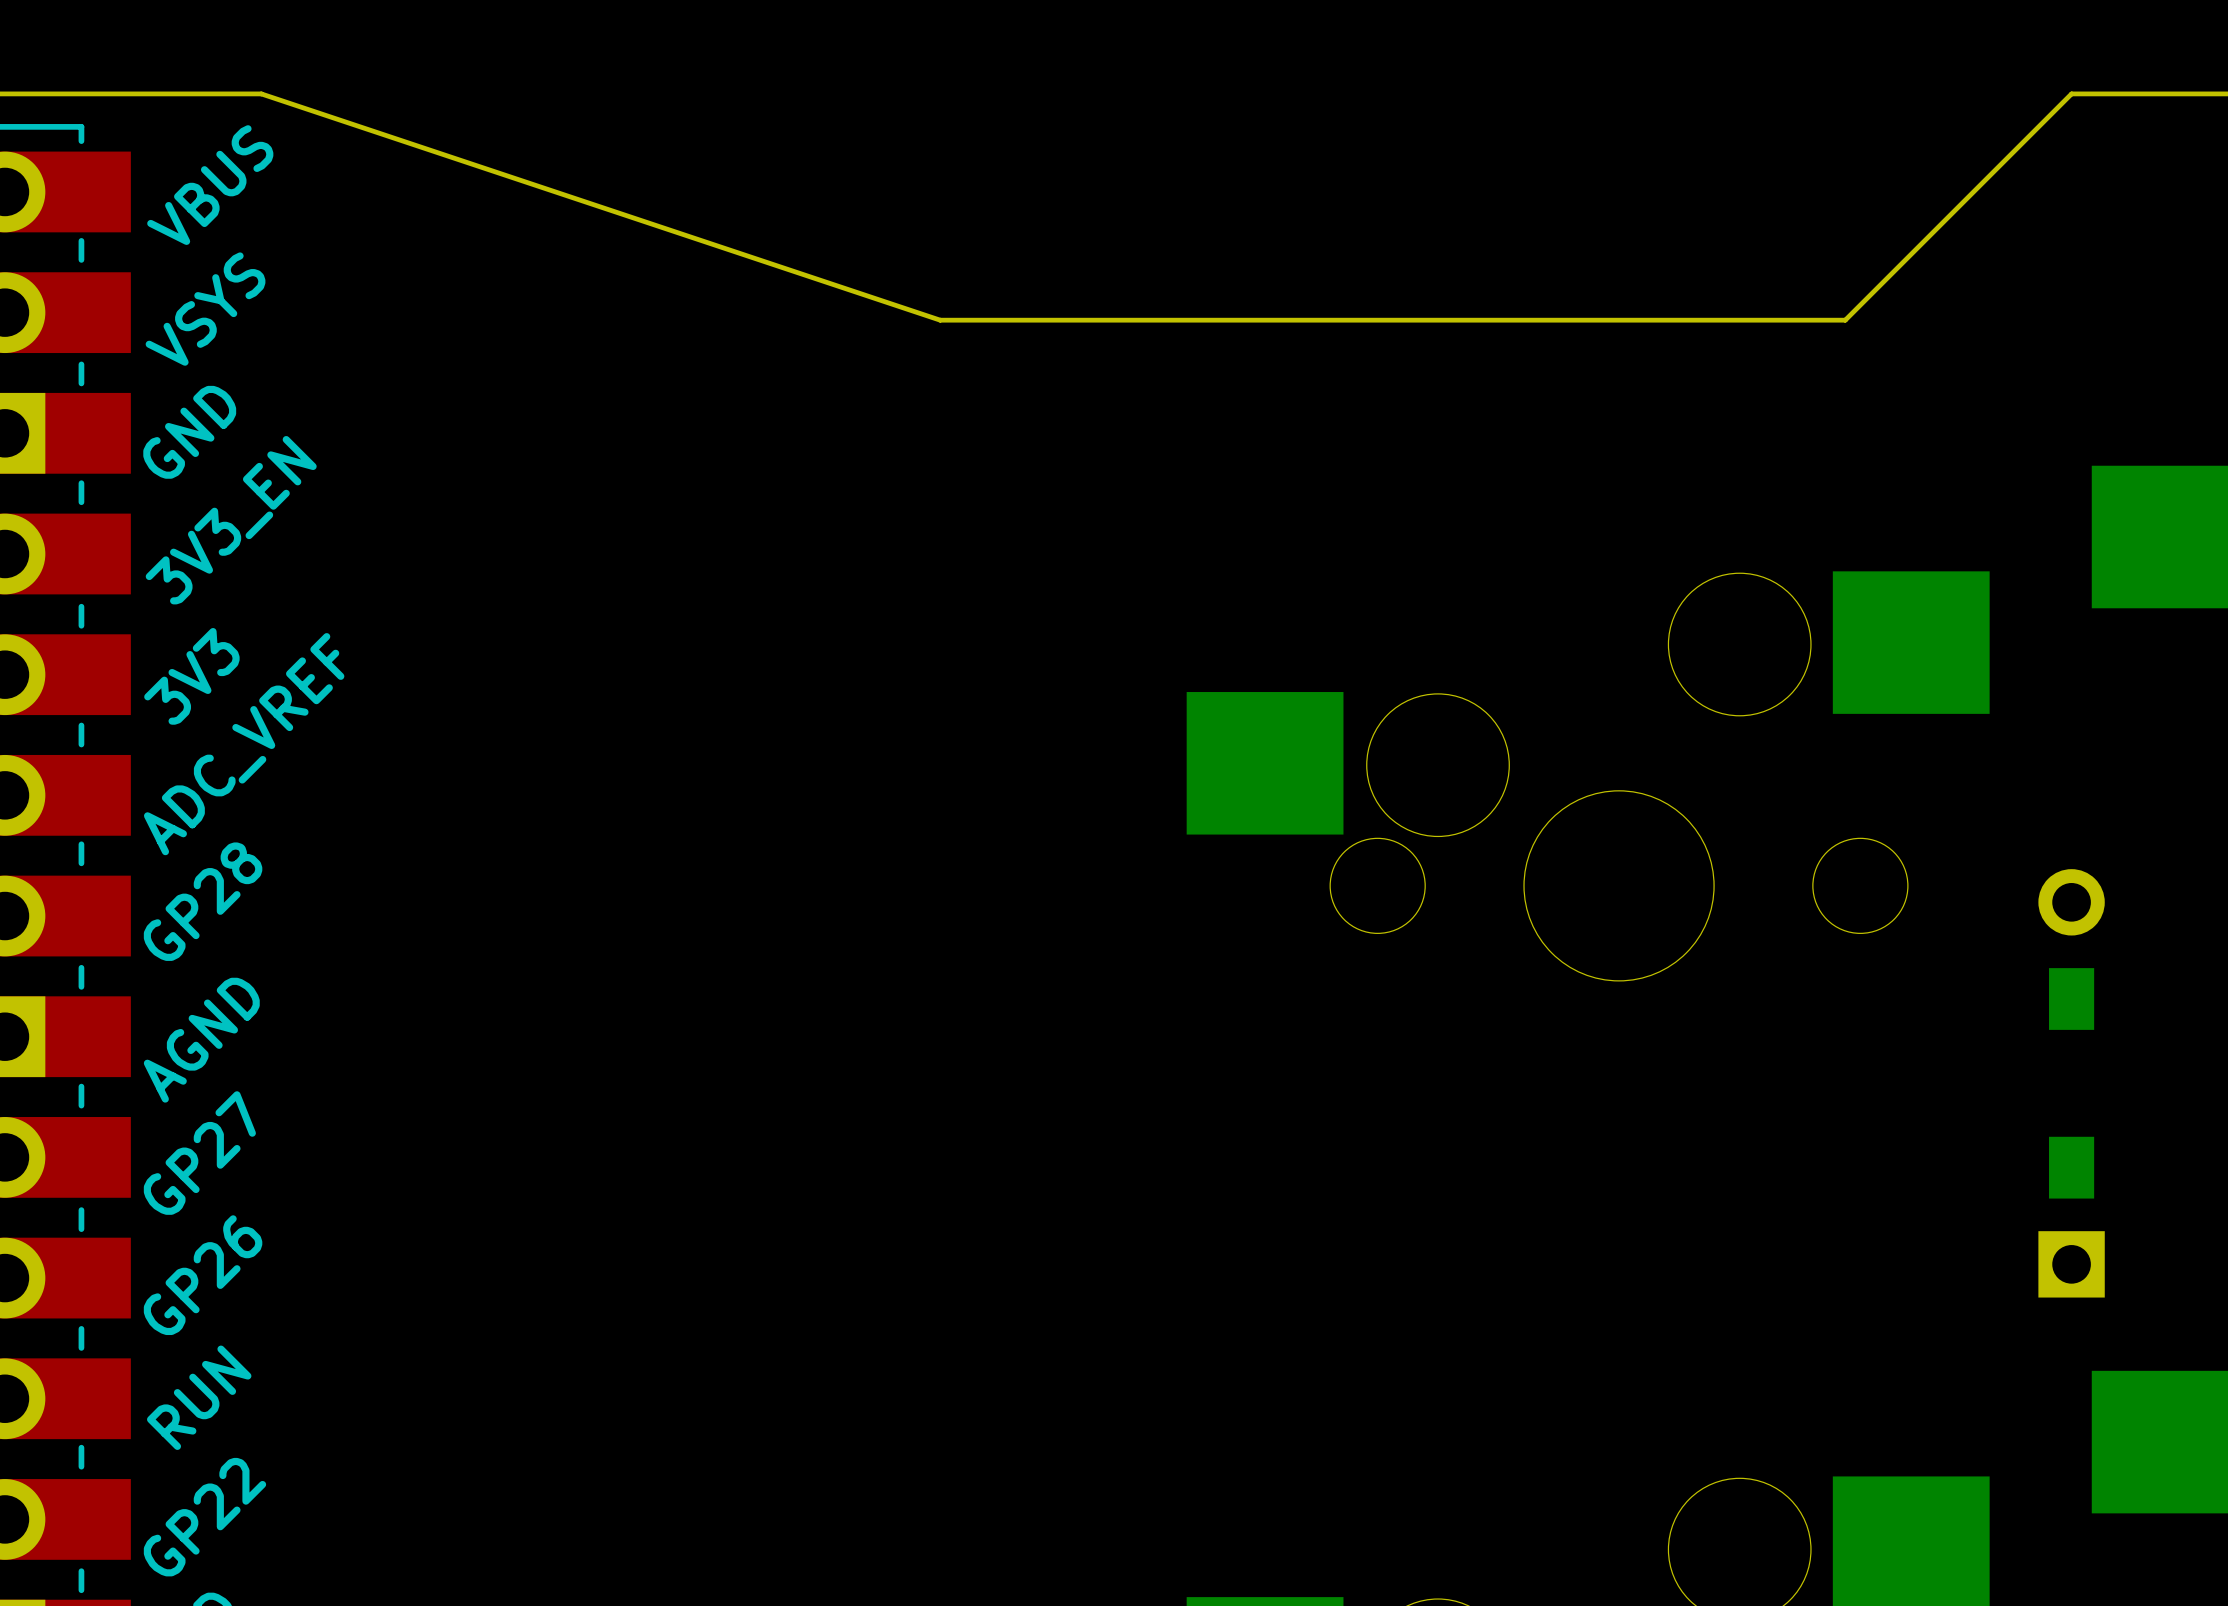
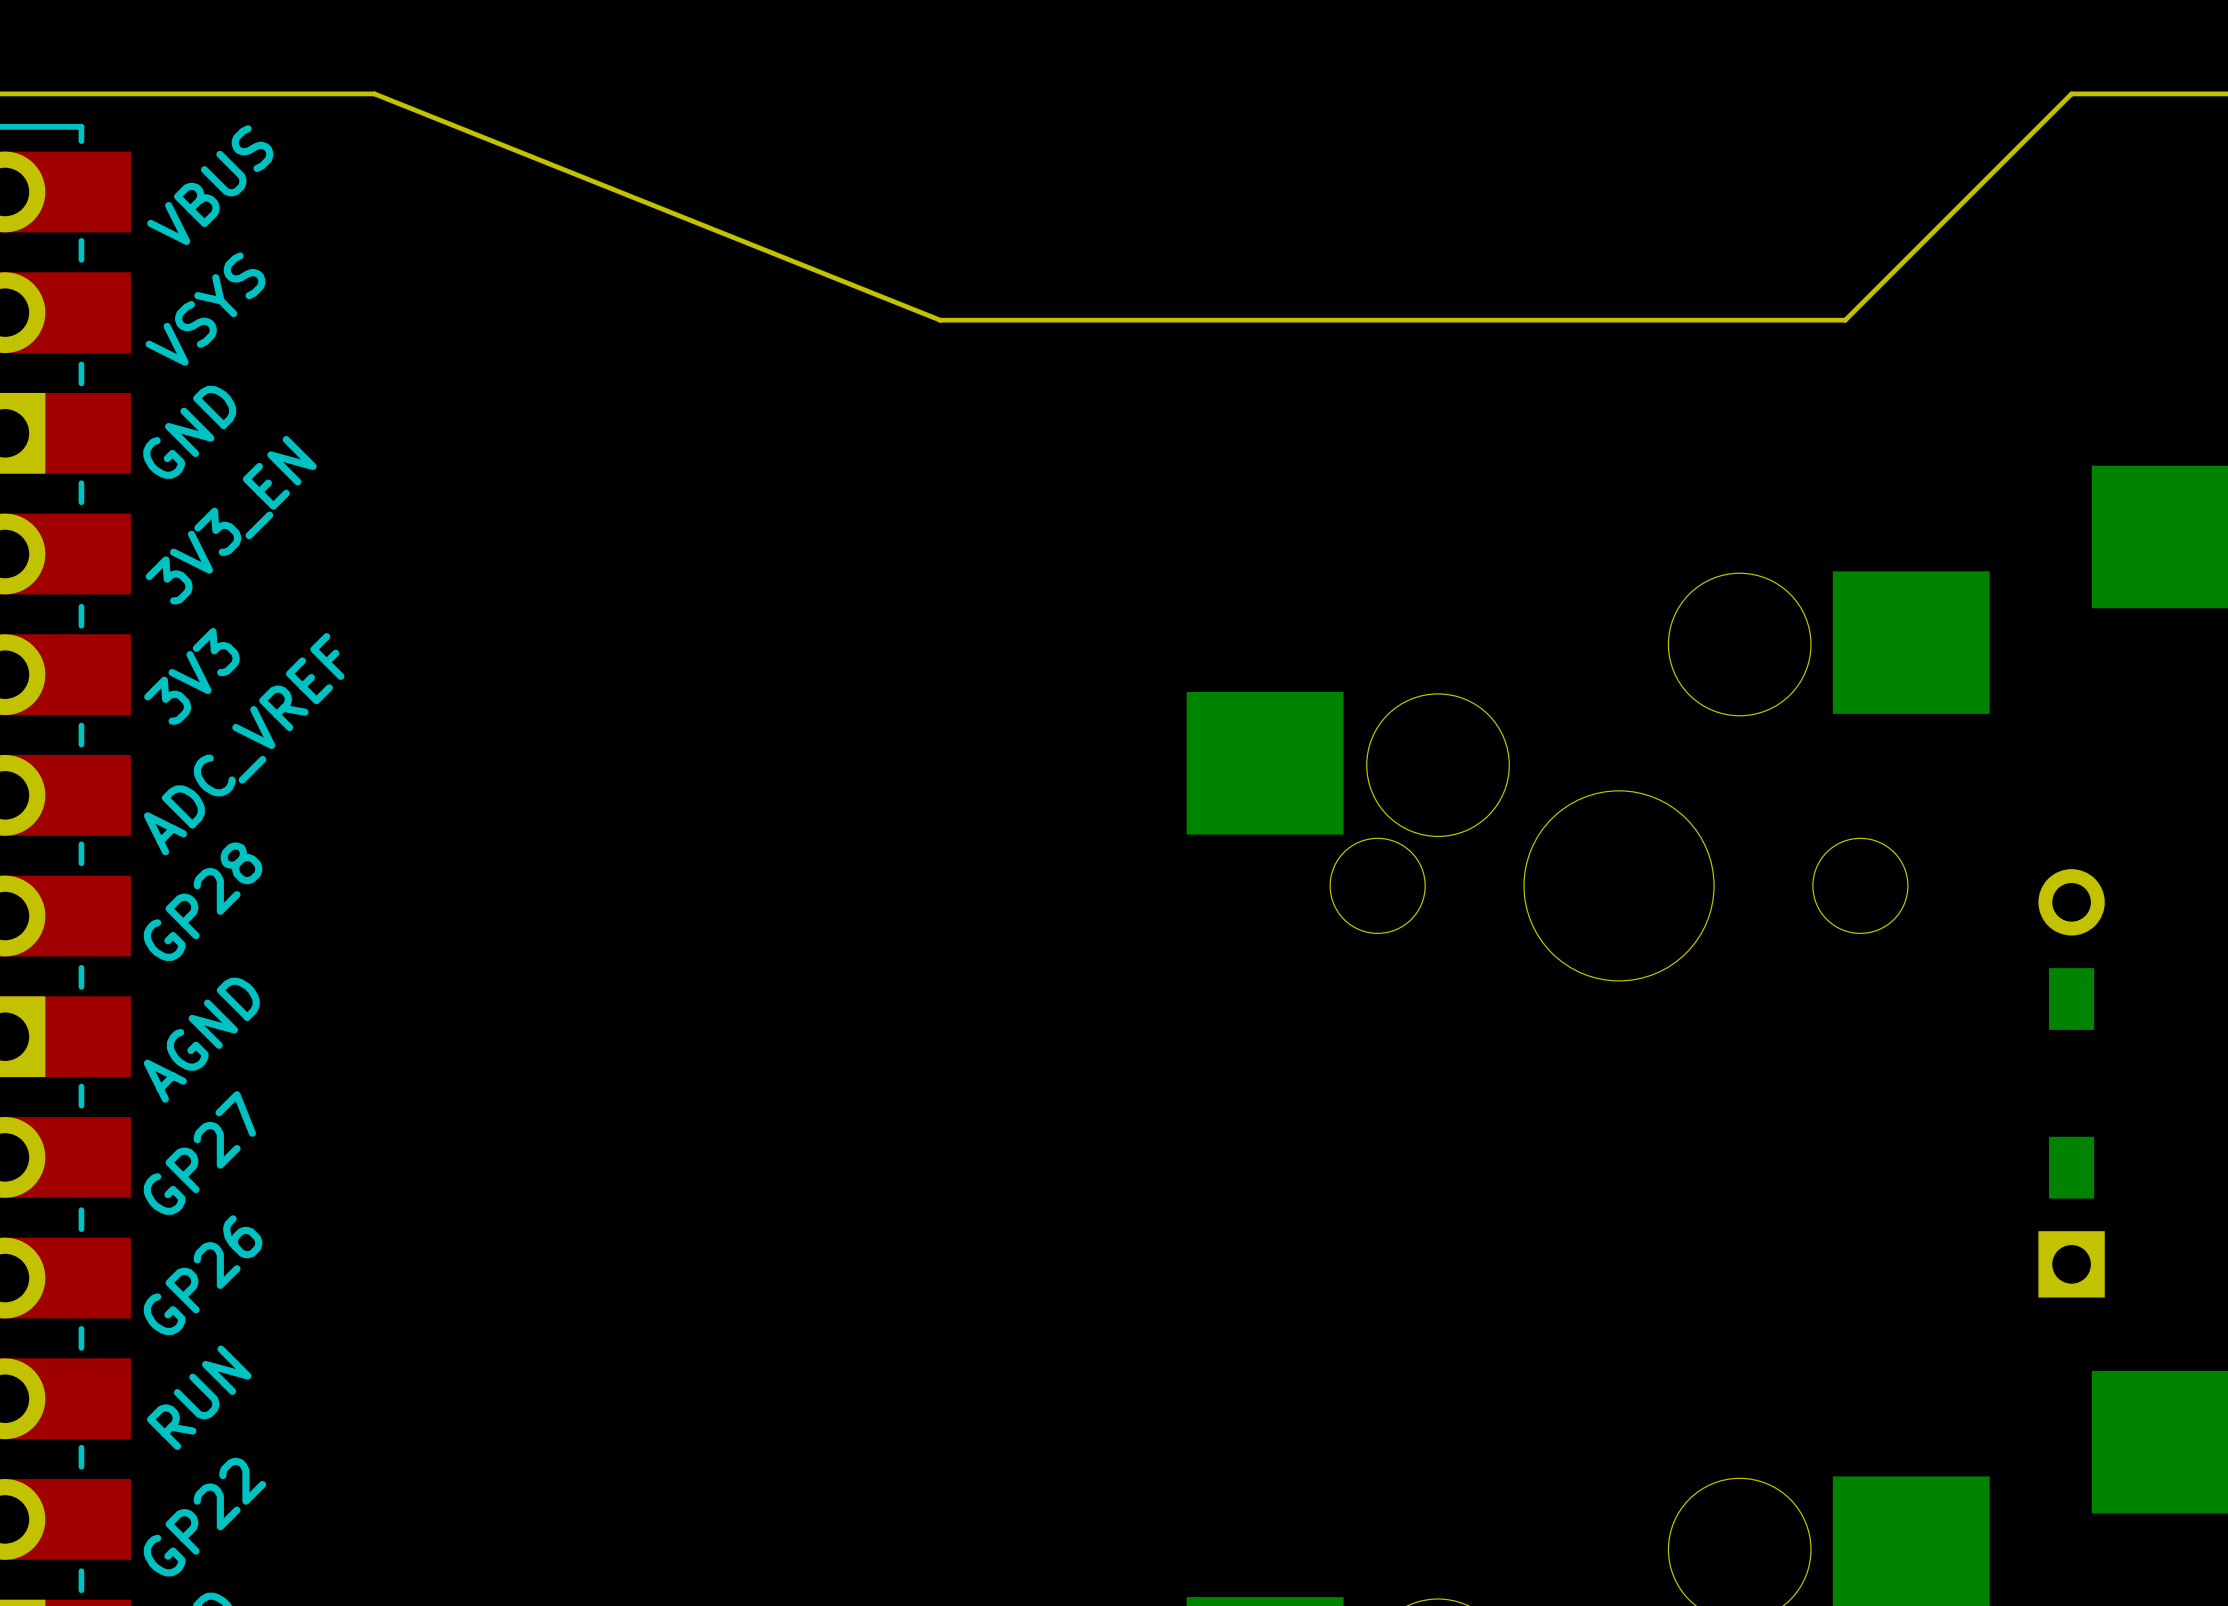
board edge: (261, 93) (940, 320) -> (261, 93) (374, 93) (940, 320)

